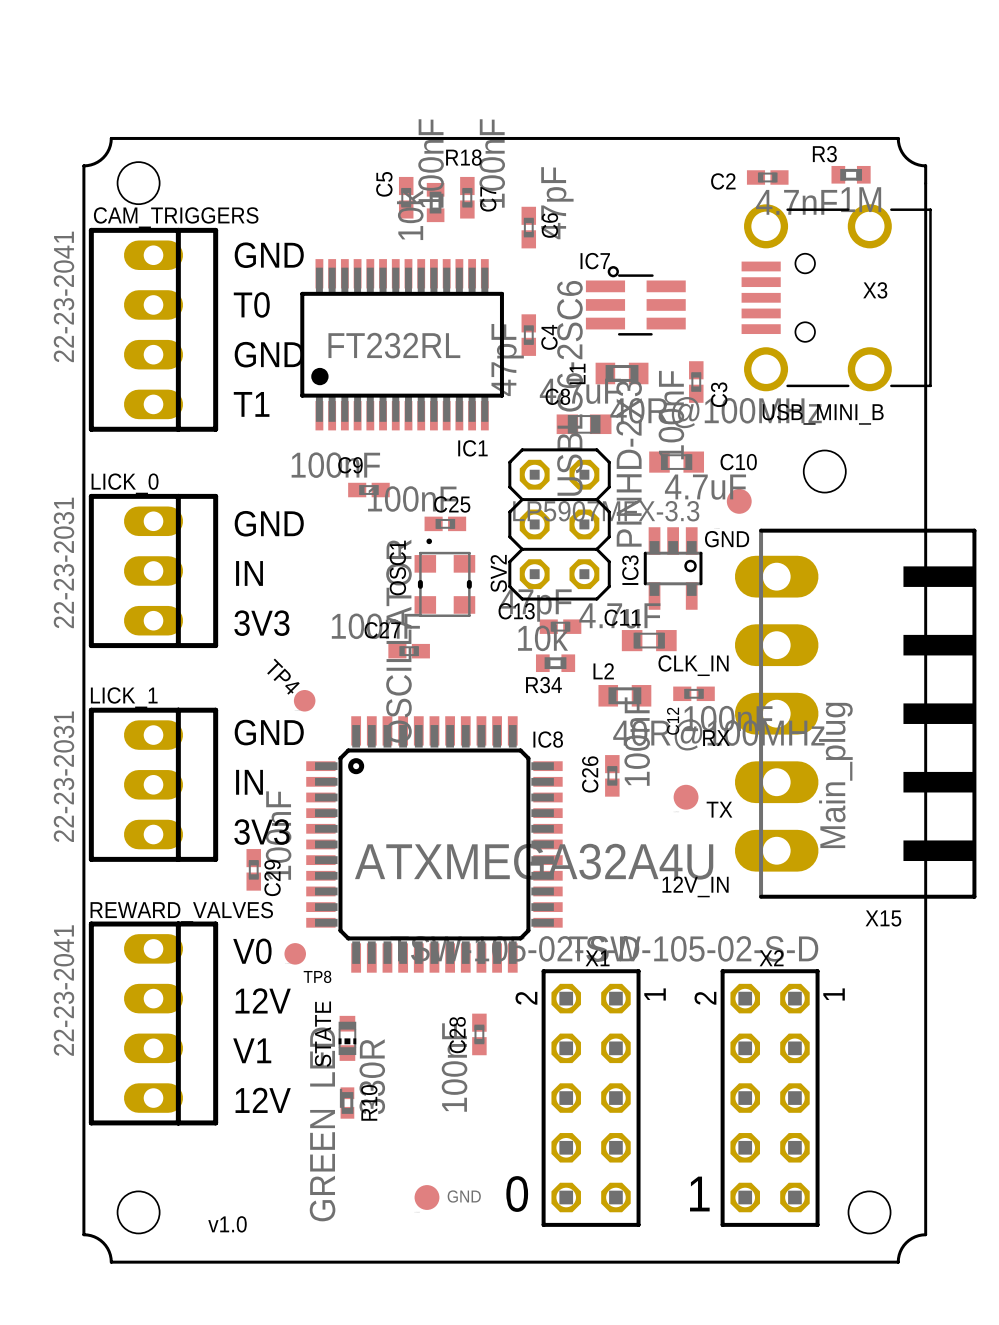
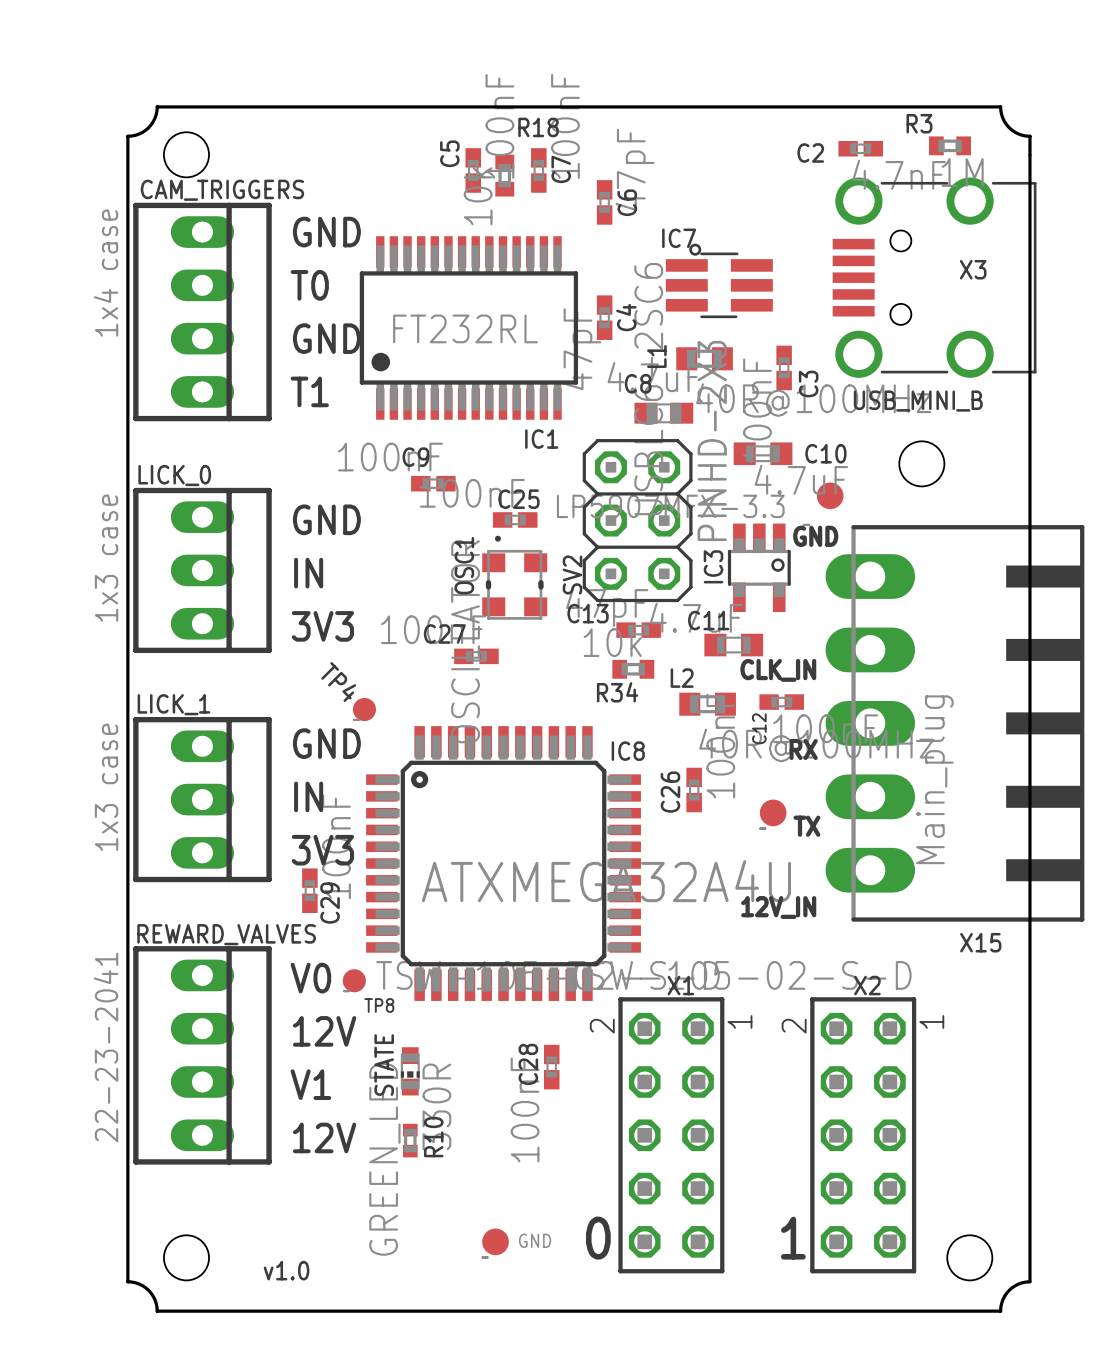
CAM_TRIGGERS value: 22-23-2041 (63, 296) -> 1x4 case (106, 273)
LICK_0 value: 22-23-2031 (63, 562) -> 1x3 case (106, 558)
LICK_1 value: 22-23-2031 (63, 776) -> 1x3 case (106, 787)

